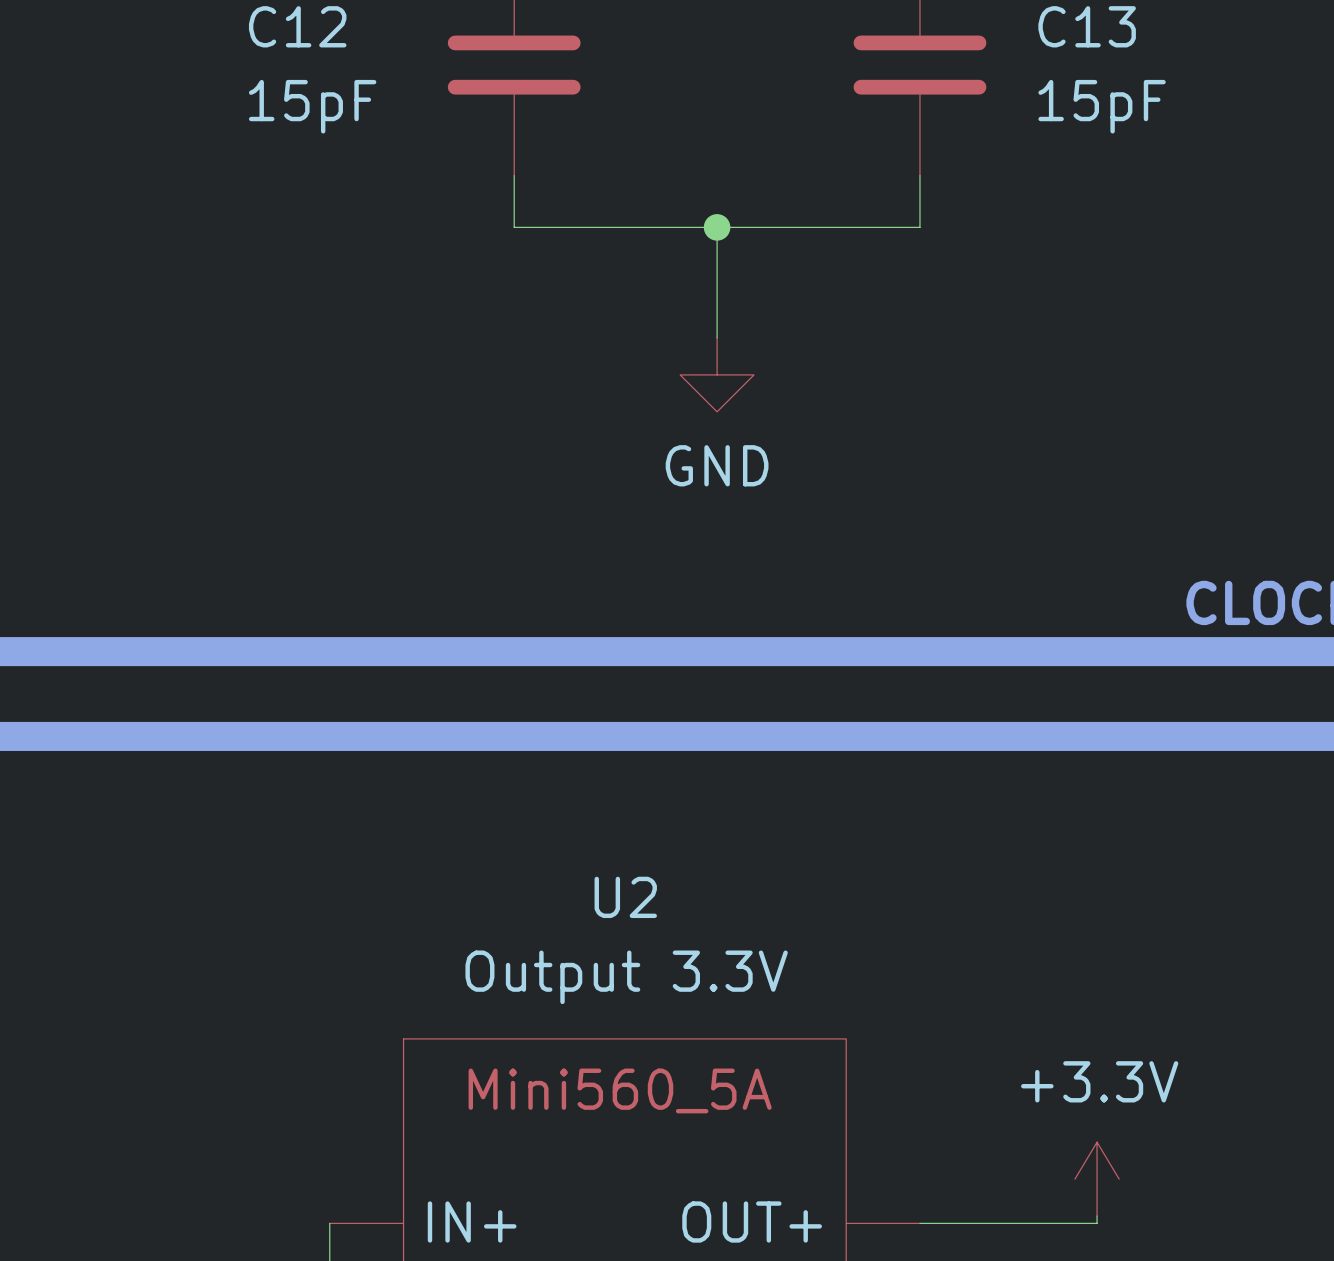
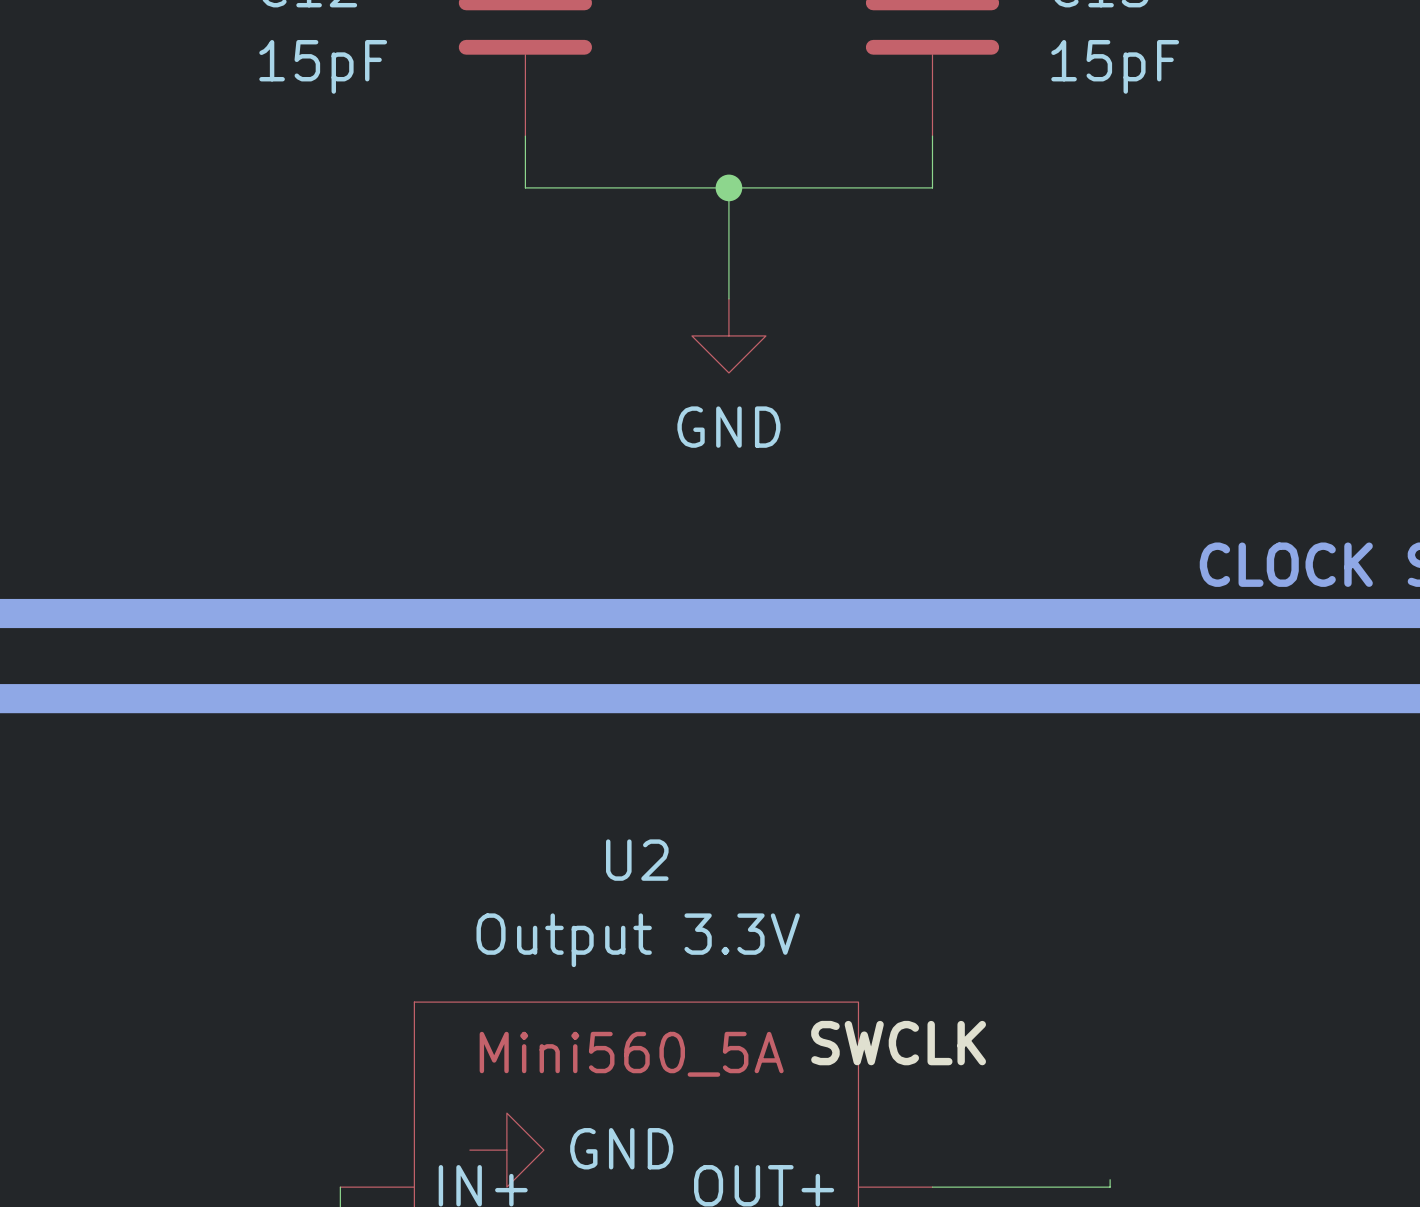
label: none -> SWCLK (898, 1043)
power symbol: +3.3V (1097, 1179) -> none
power symbol: none -> GND (506, 1150)

